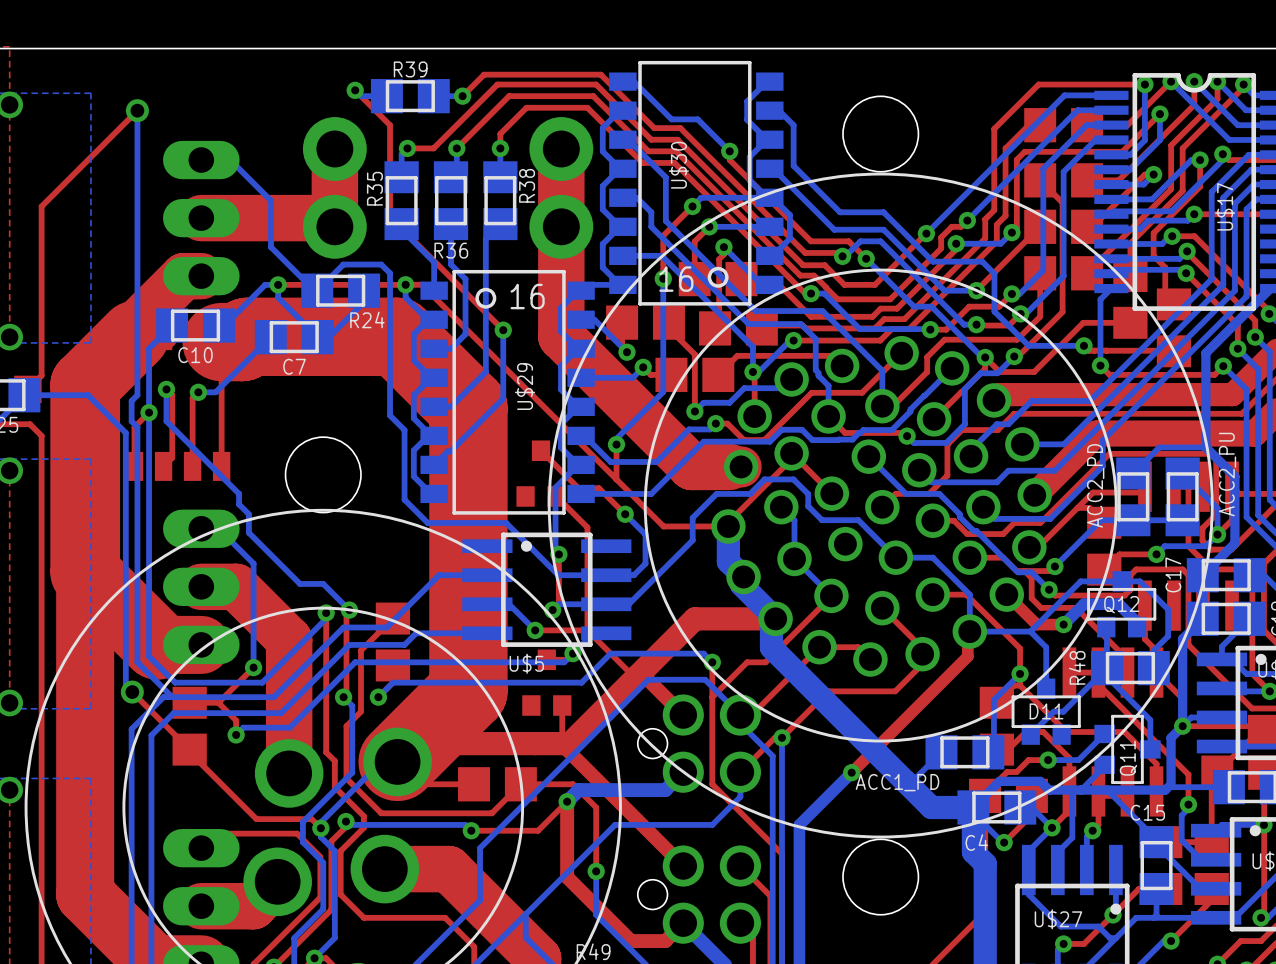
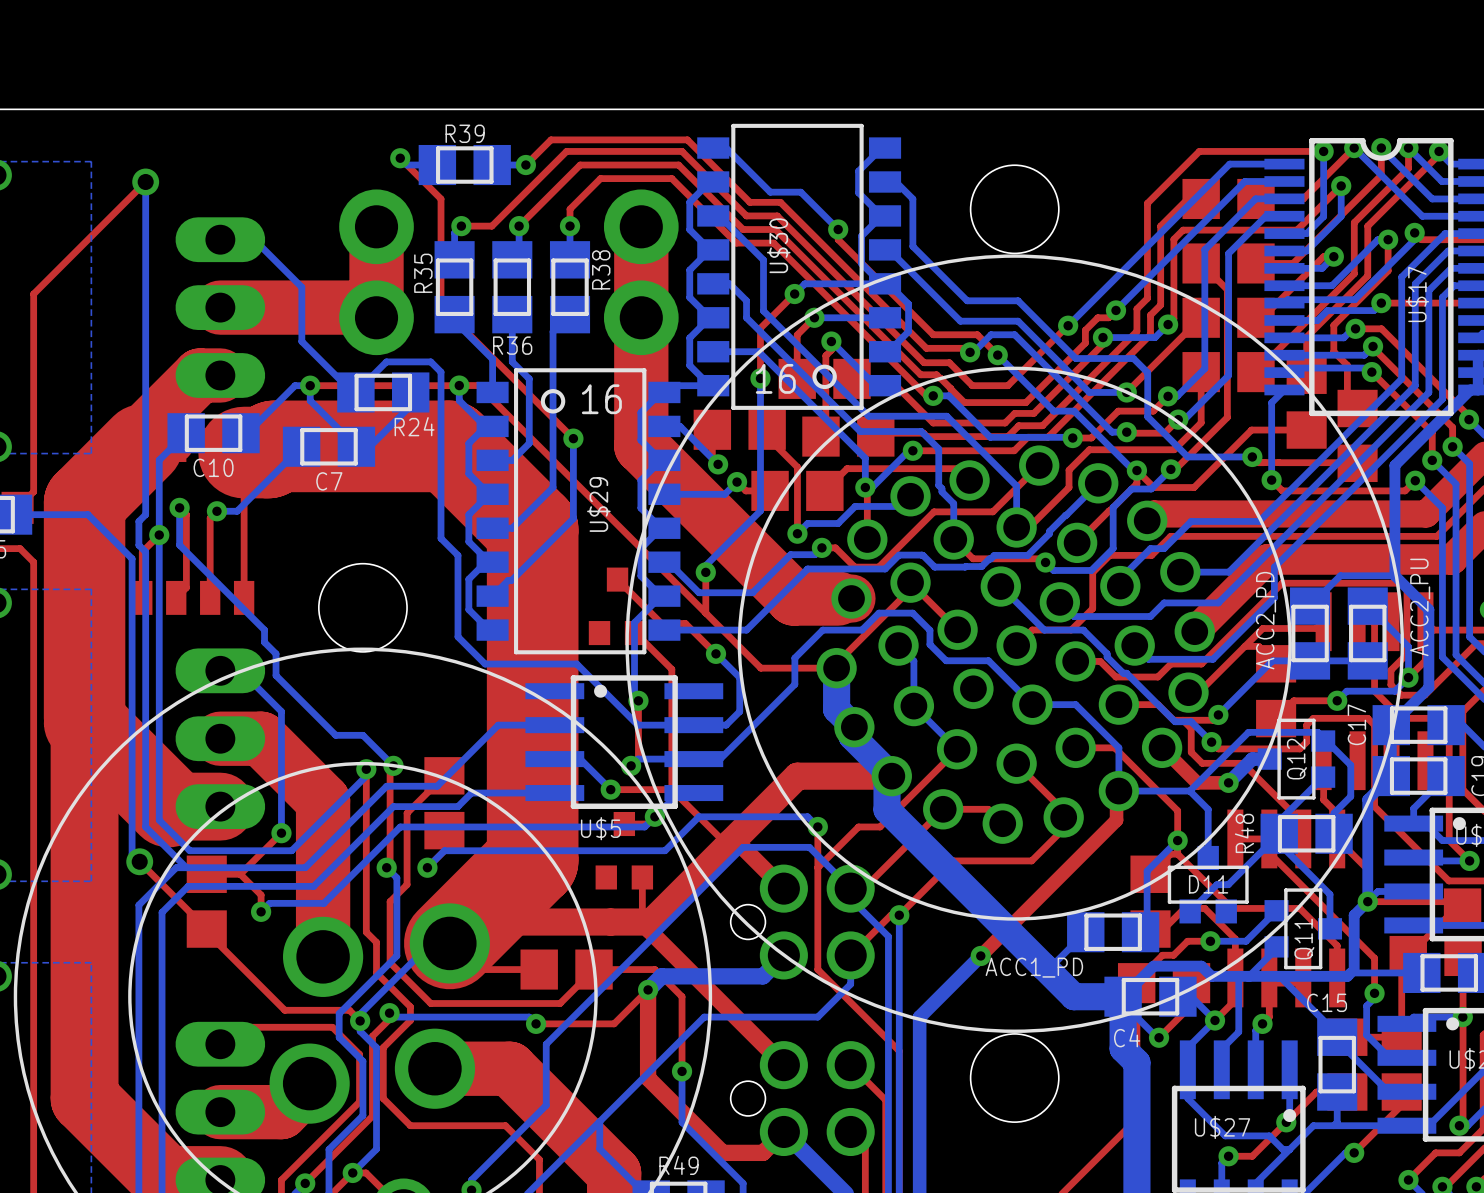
bottom track: (1098, 604) (1118, 604) (1137, 622) (1137, 627) -> none
Q12 rotation: 0° (1121, 604) -> 90° counterclockwise (1296, 759)
bottom track: (1106, 627) (1106, 657) -> (1323, 777) (1279, 821)

